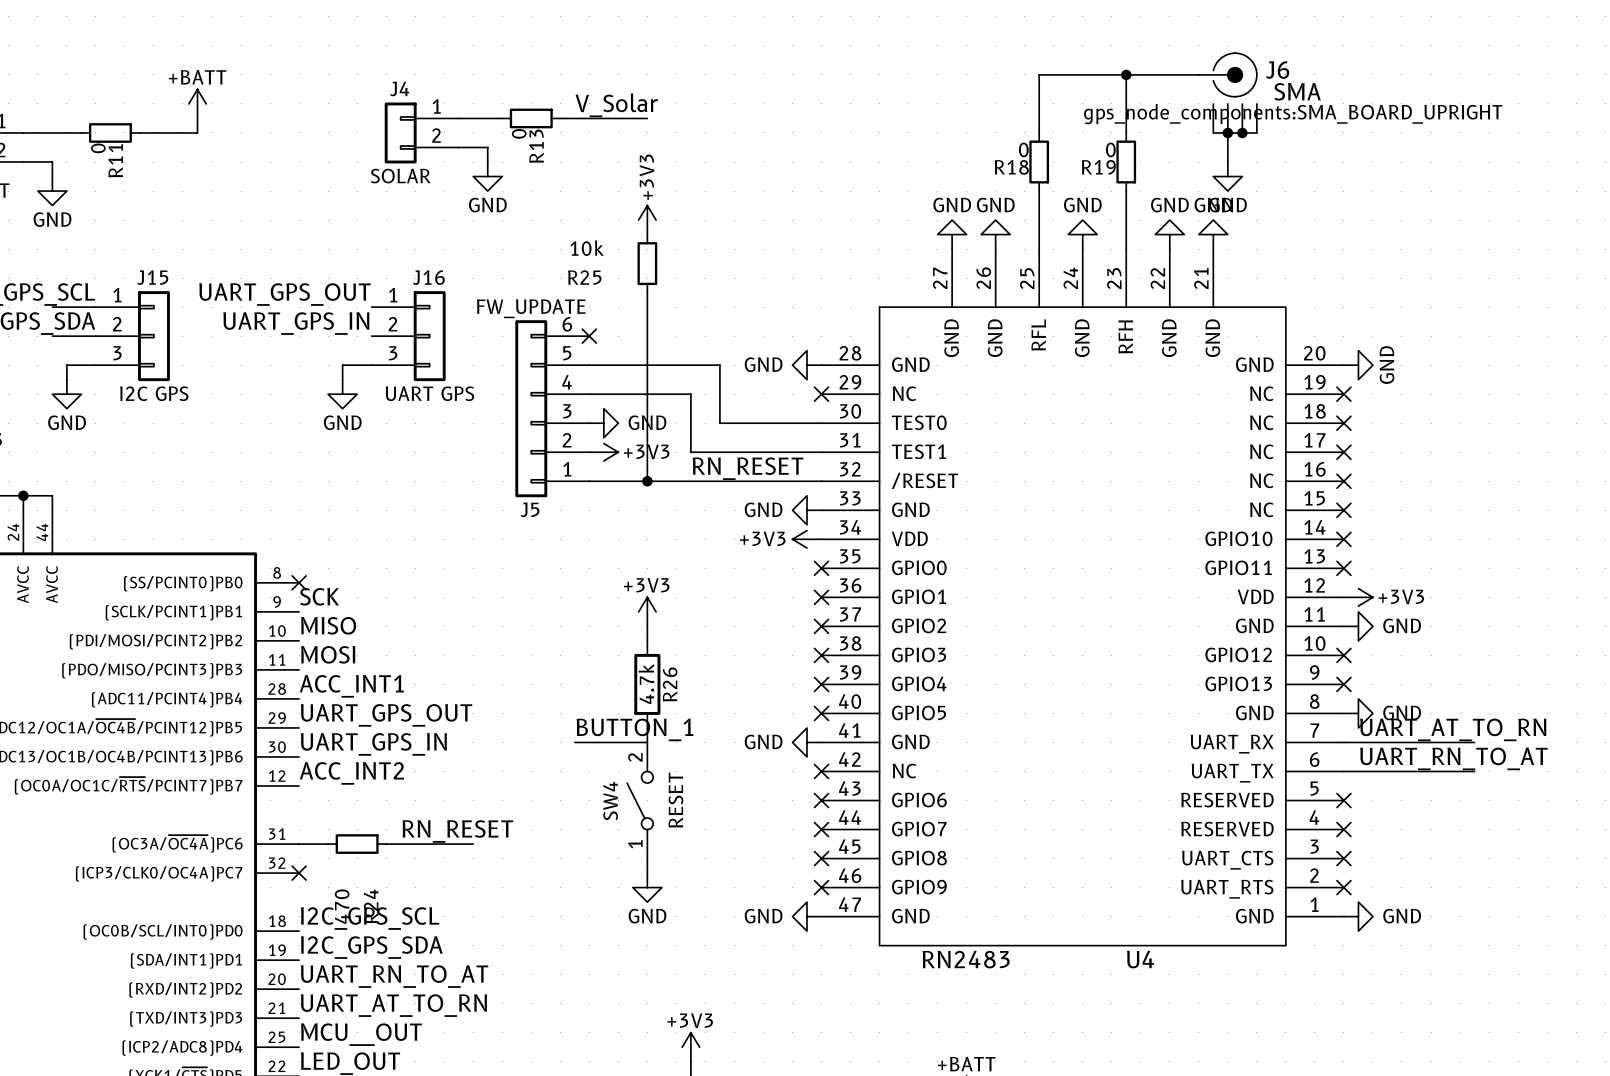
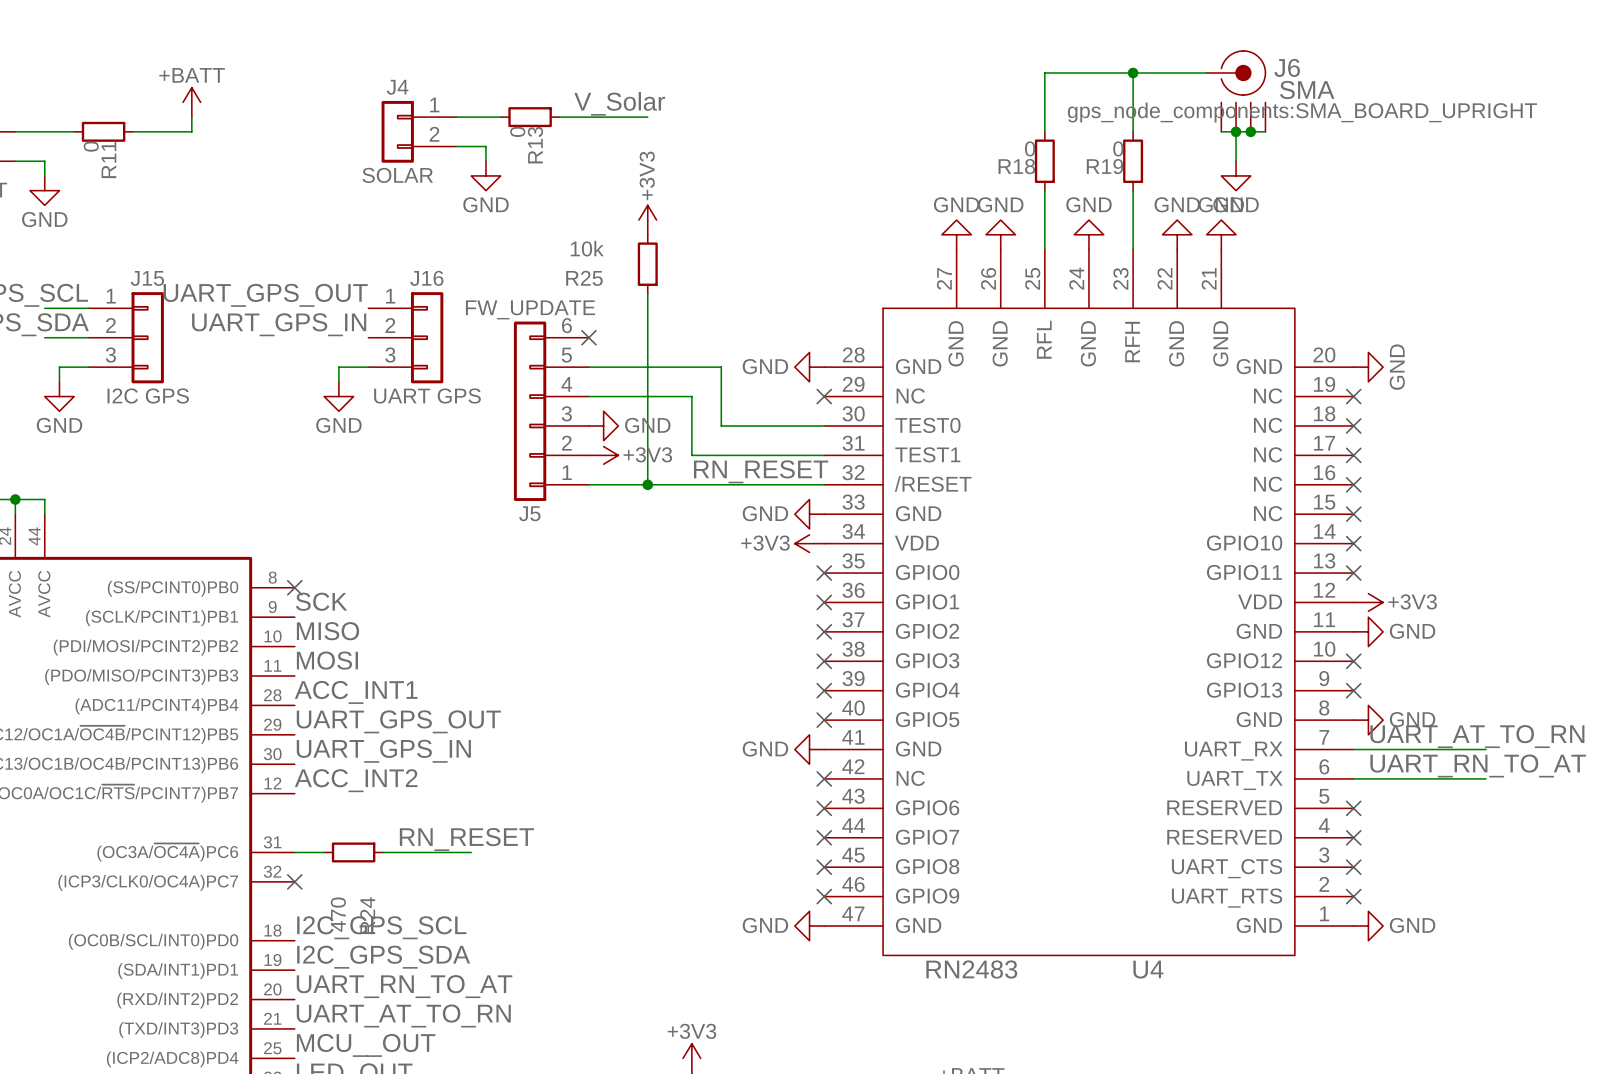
power symbol: +3V3 (647, 611) -> none
wire: (647, 626) (647, 640) -> none
R26: 4.7k (647, 684) -> none
wire: (647, 727) (647, 742) (574, 742) -> none
label: BUTTON_1 (635, 729) -> none
SW4: RESET (640, 800) -> none
wire: (647, 858) (647, 873) -> none
power symbol: GND (647, 887) -> none

